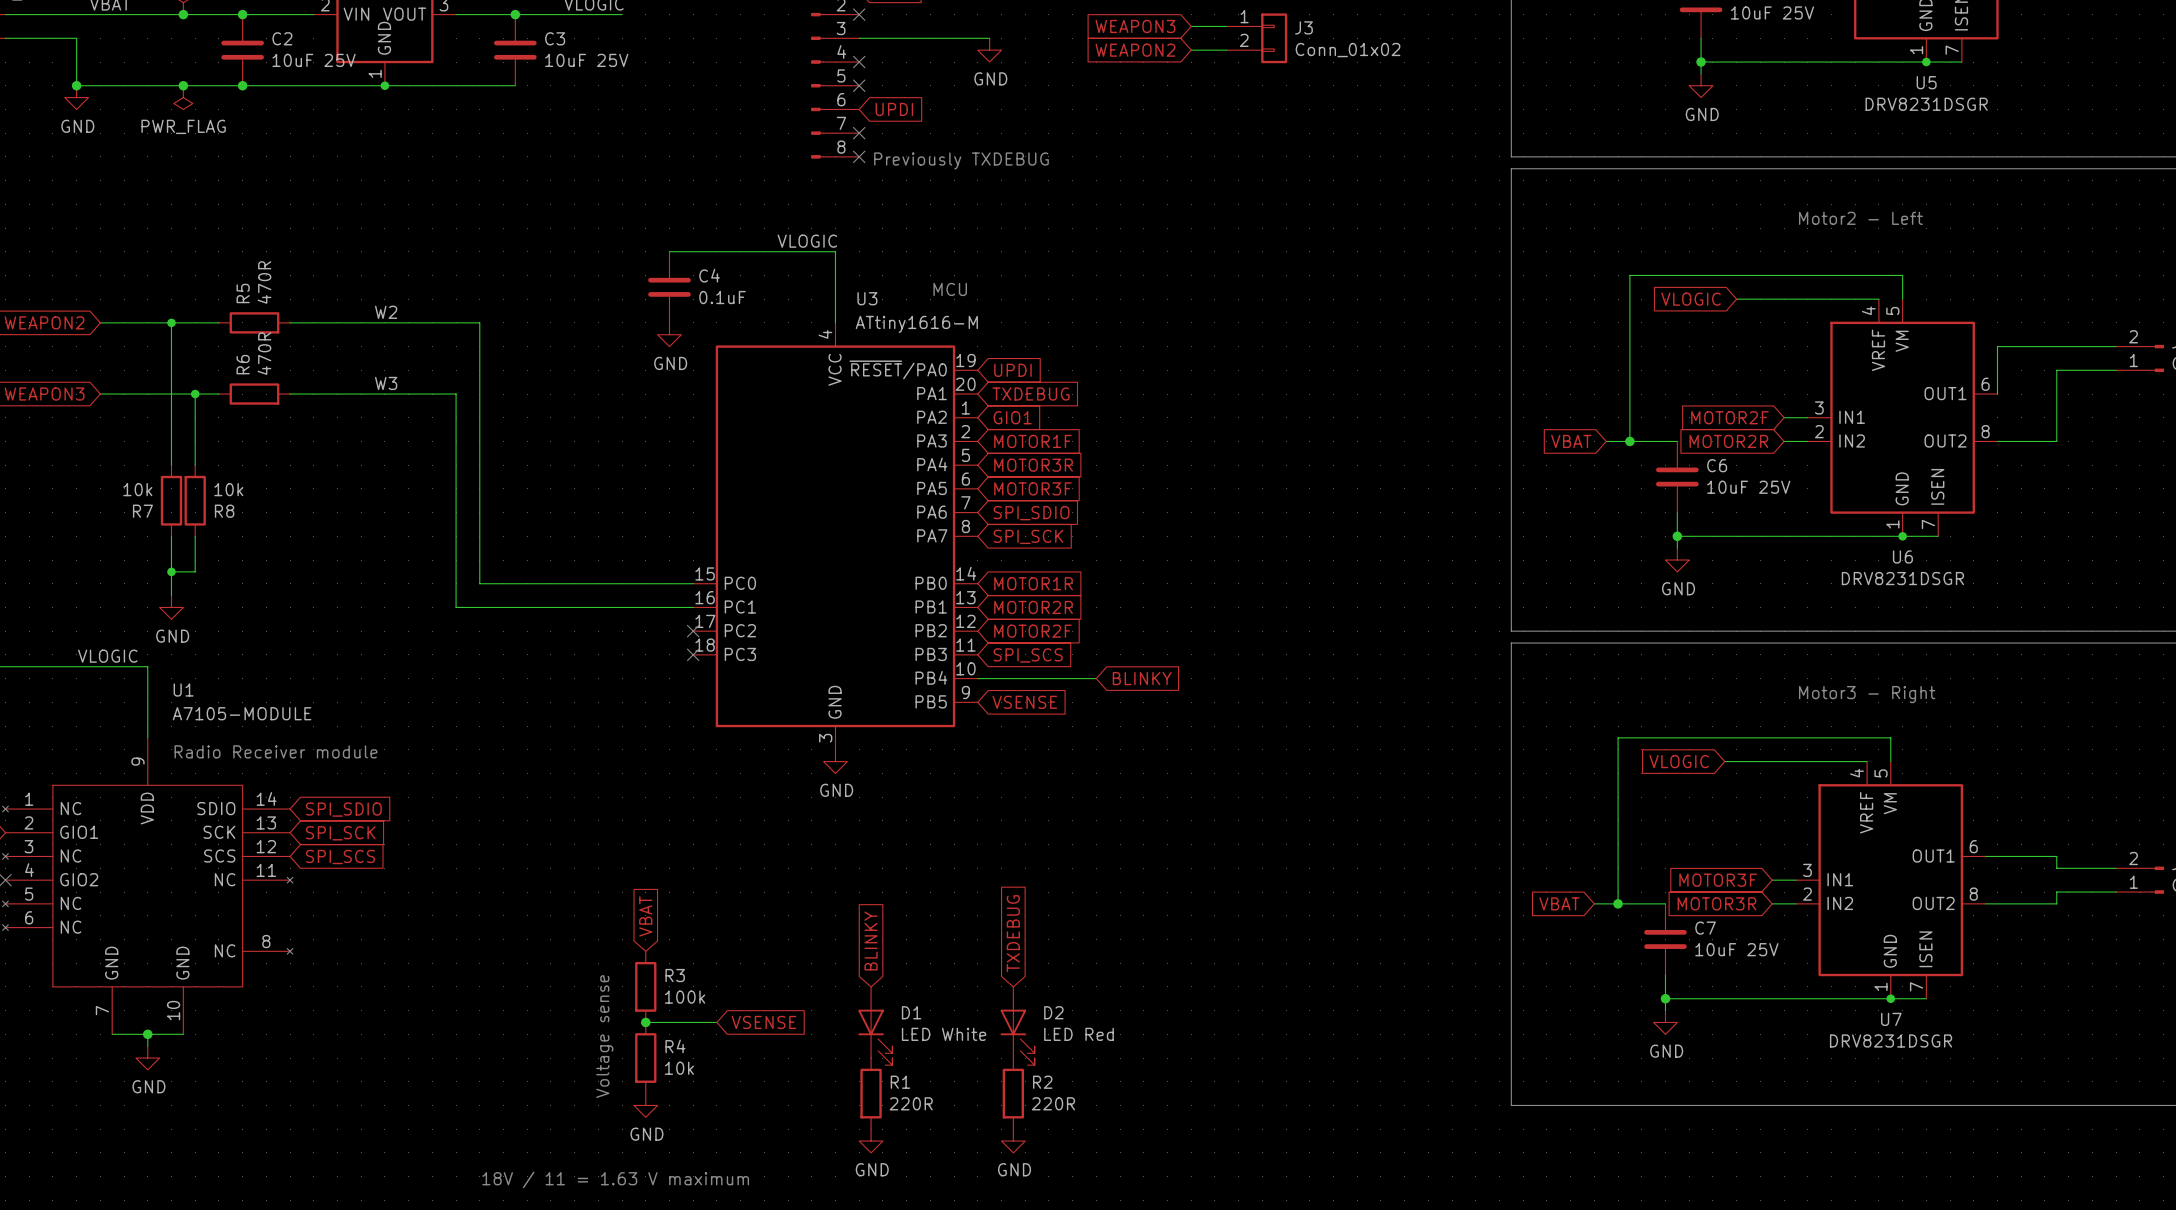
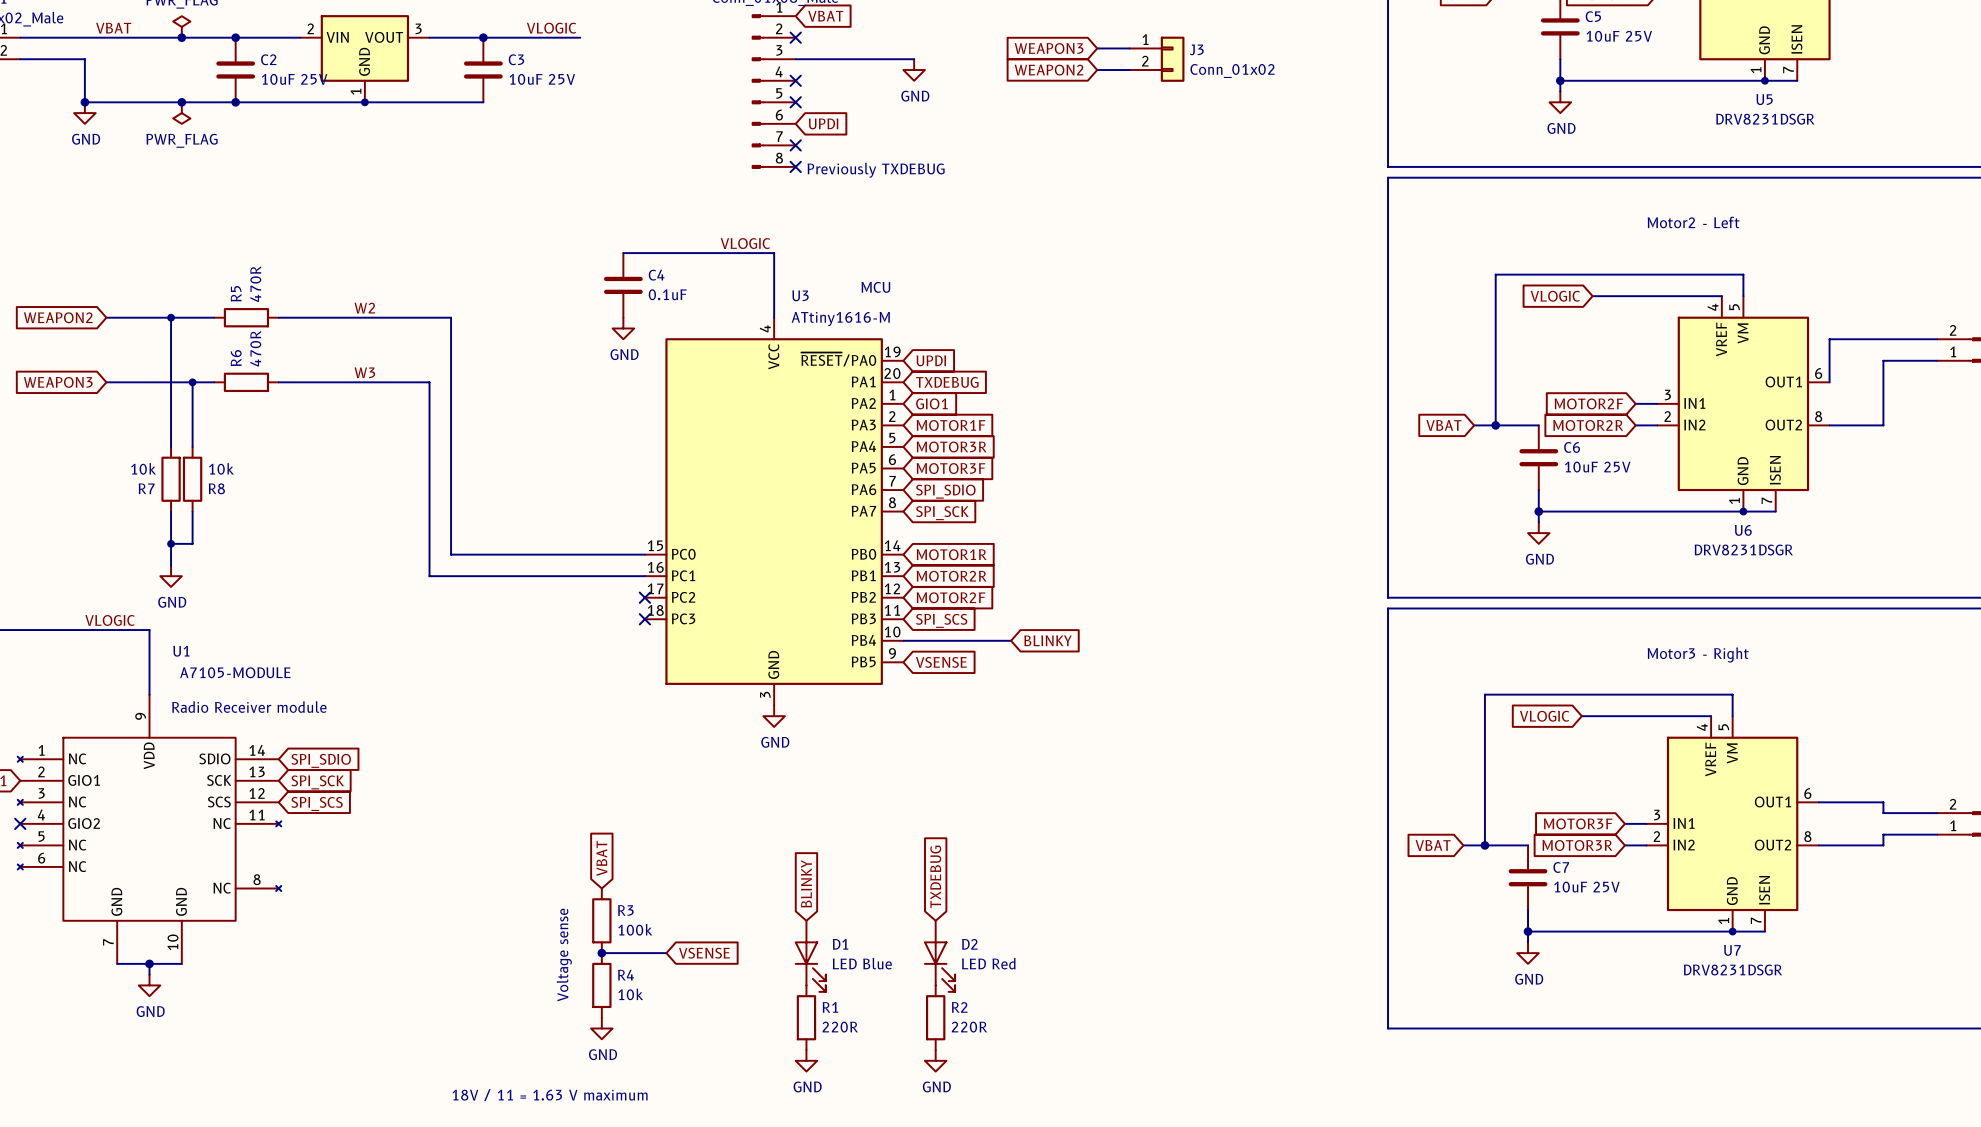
D1 value: LED White (944, 1034) -> LED Blue (862, 963)

